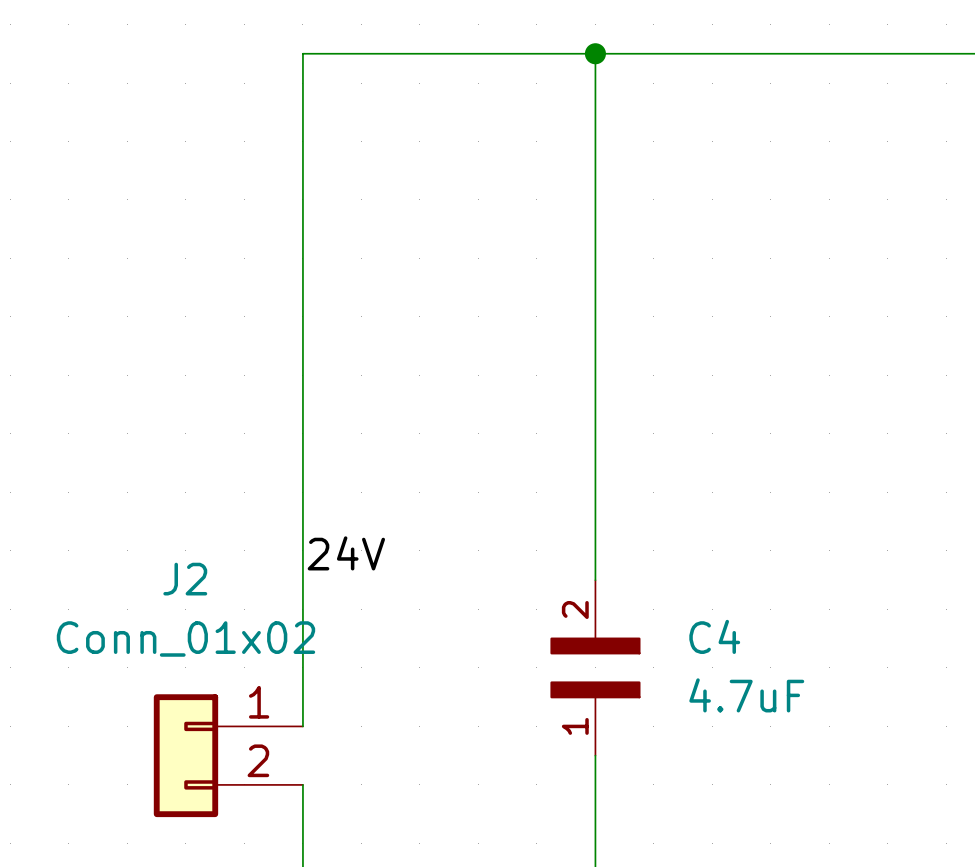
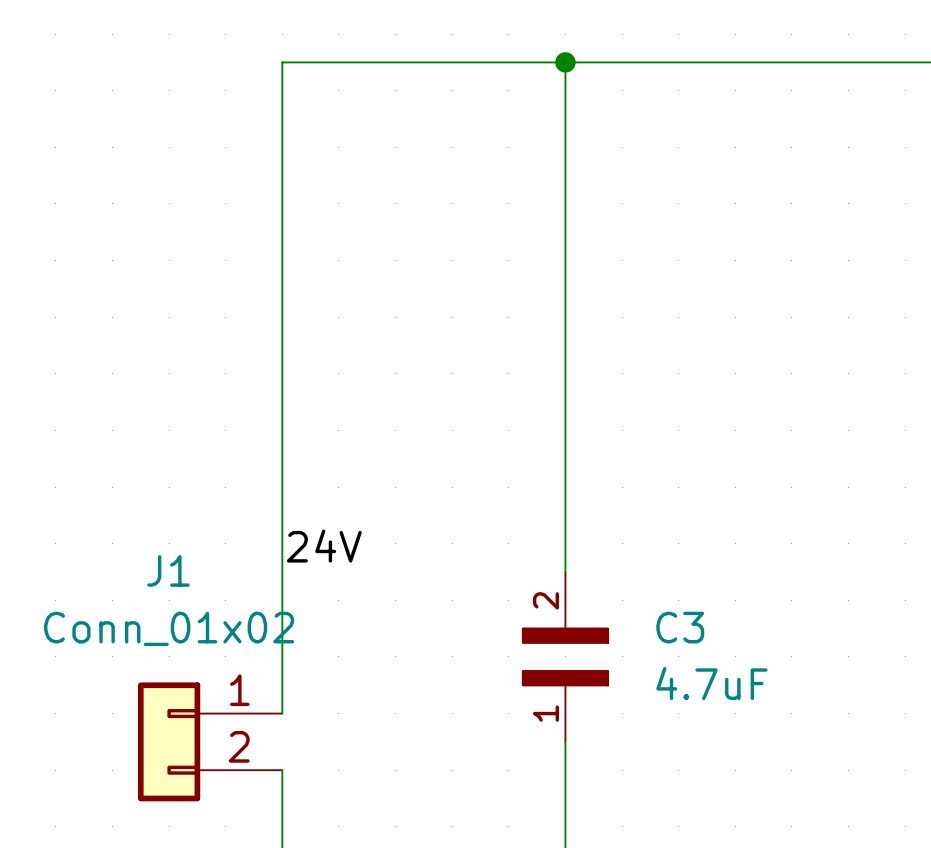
J2 name: J2 (185, 579) -> J1 (168, 570)
C4 name: C4 (714, 636) -> C3 (680, 627)

